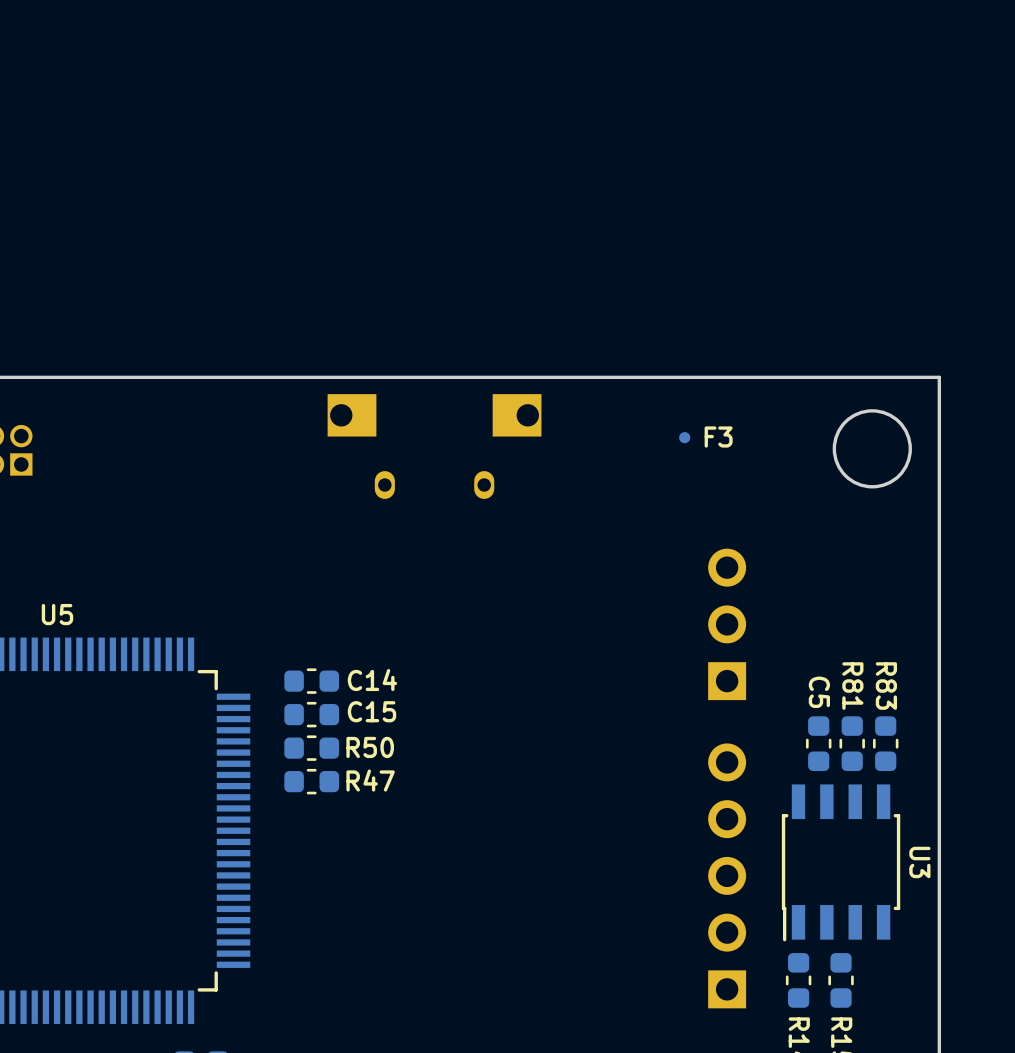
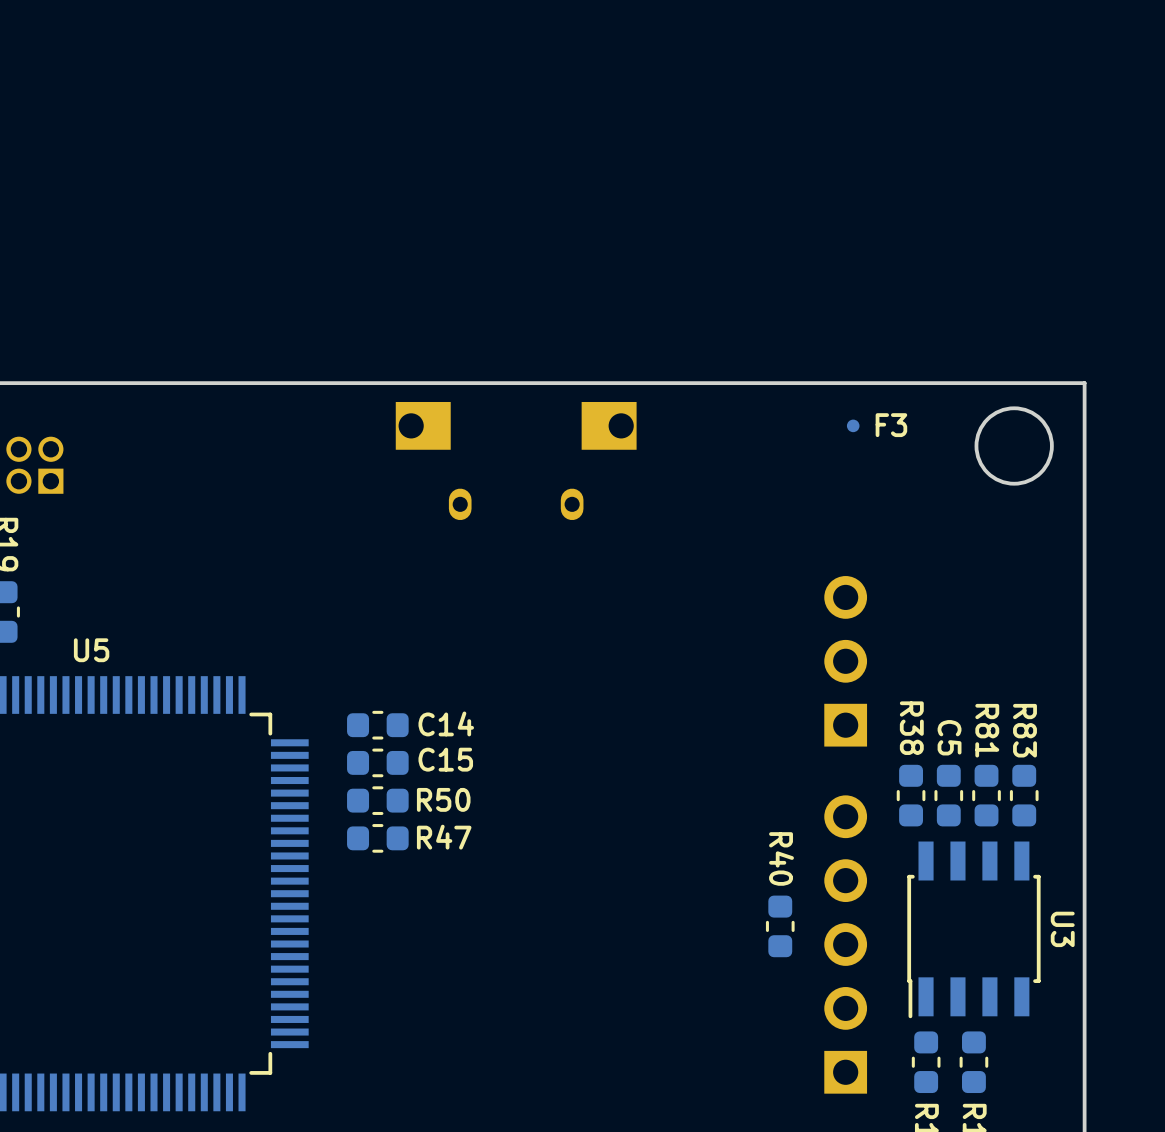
round board edge size: [832, 409, 912, 489] -> [974, 406, 1054, 486]
F3 position: (684, 437) -> (853, 425)
R38: none -> (911, 795)
R40: none -> (780, 926)

